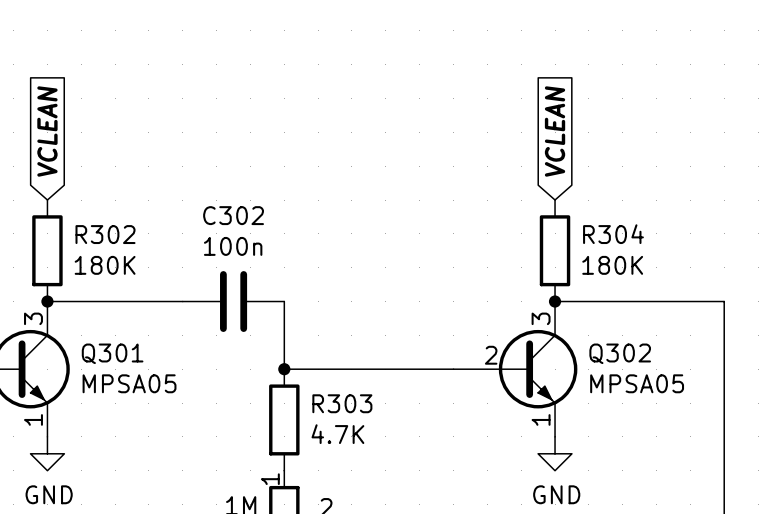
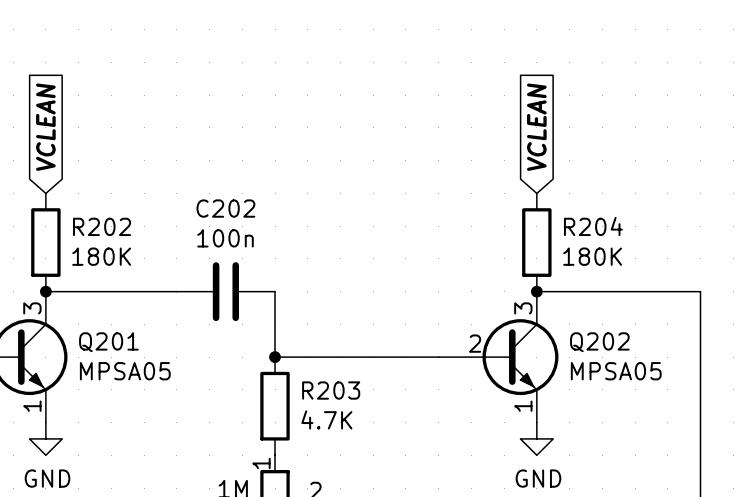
C302 name: C302 (233, 215) -> C202 (225, 208)
R302 name: R302 (105, 234) -> R202 (102, 226)
R304 name: R304 (613, 234) -> R204 (593, 226)
Q301 name: Q301 (112, 353) -> Q201 (108, 342)
Q302 name: Q302 (620, 353) -> Q202 (599, 342)
R303 name: R303 (342, 403) -> R203 (331, 390)

